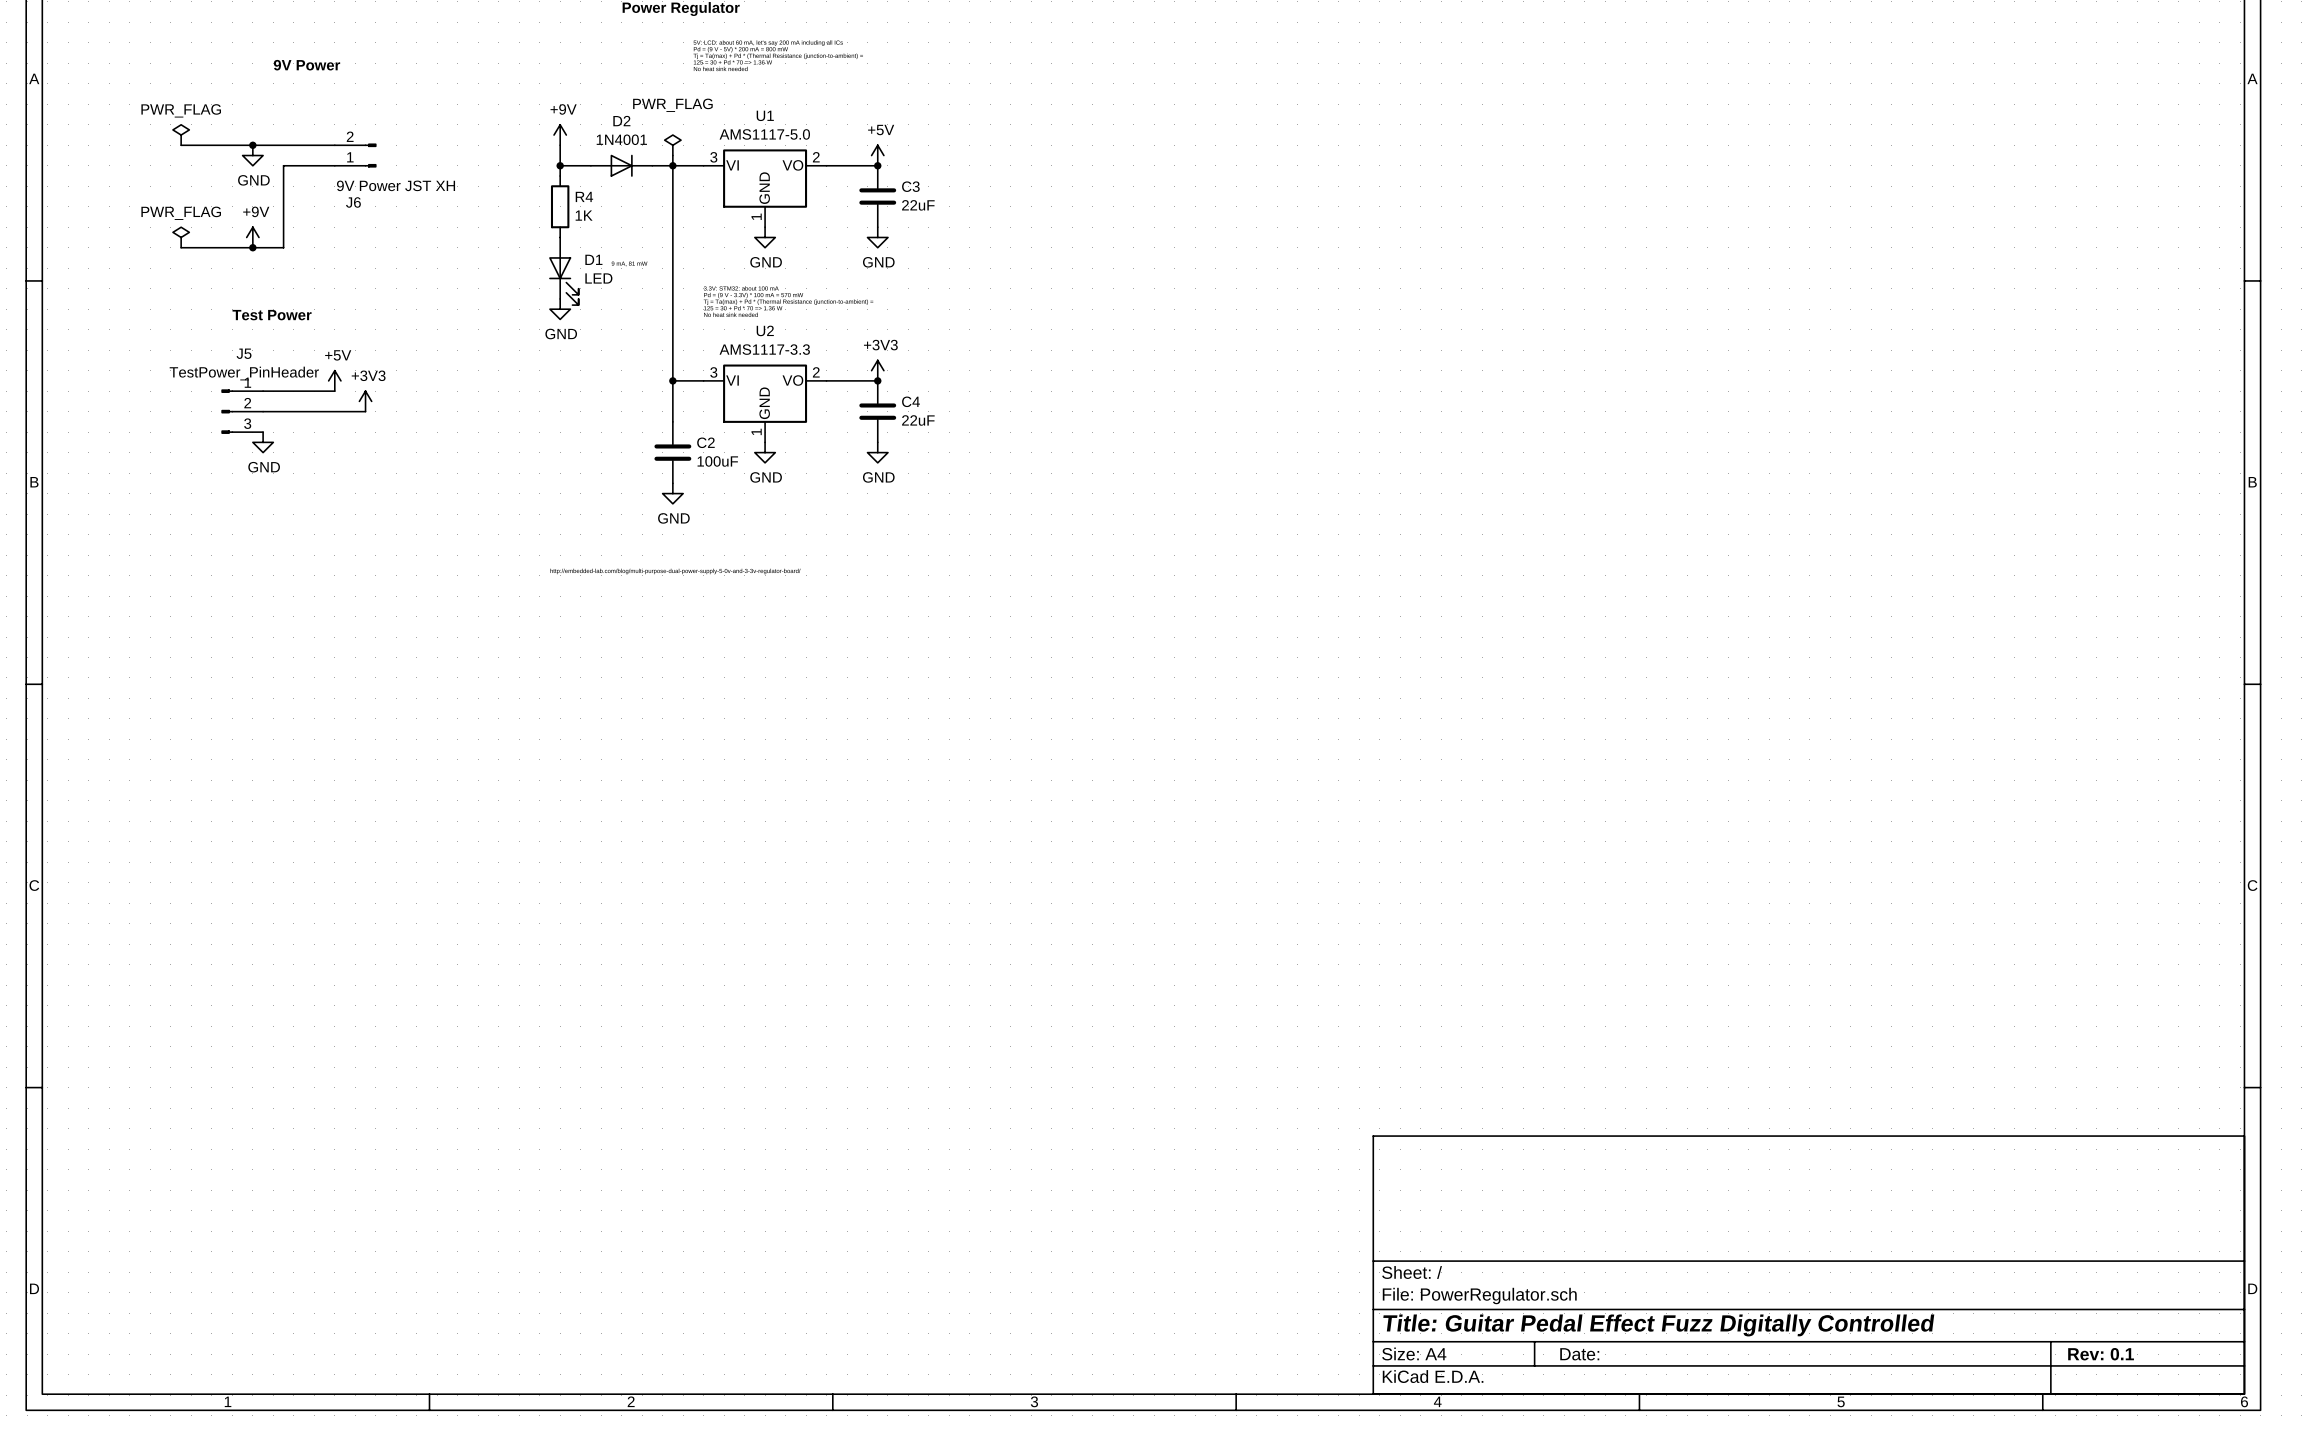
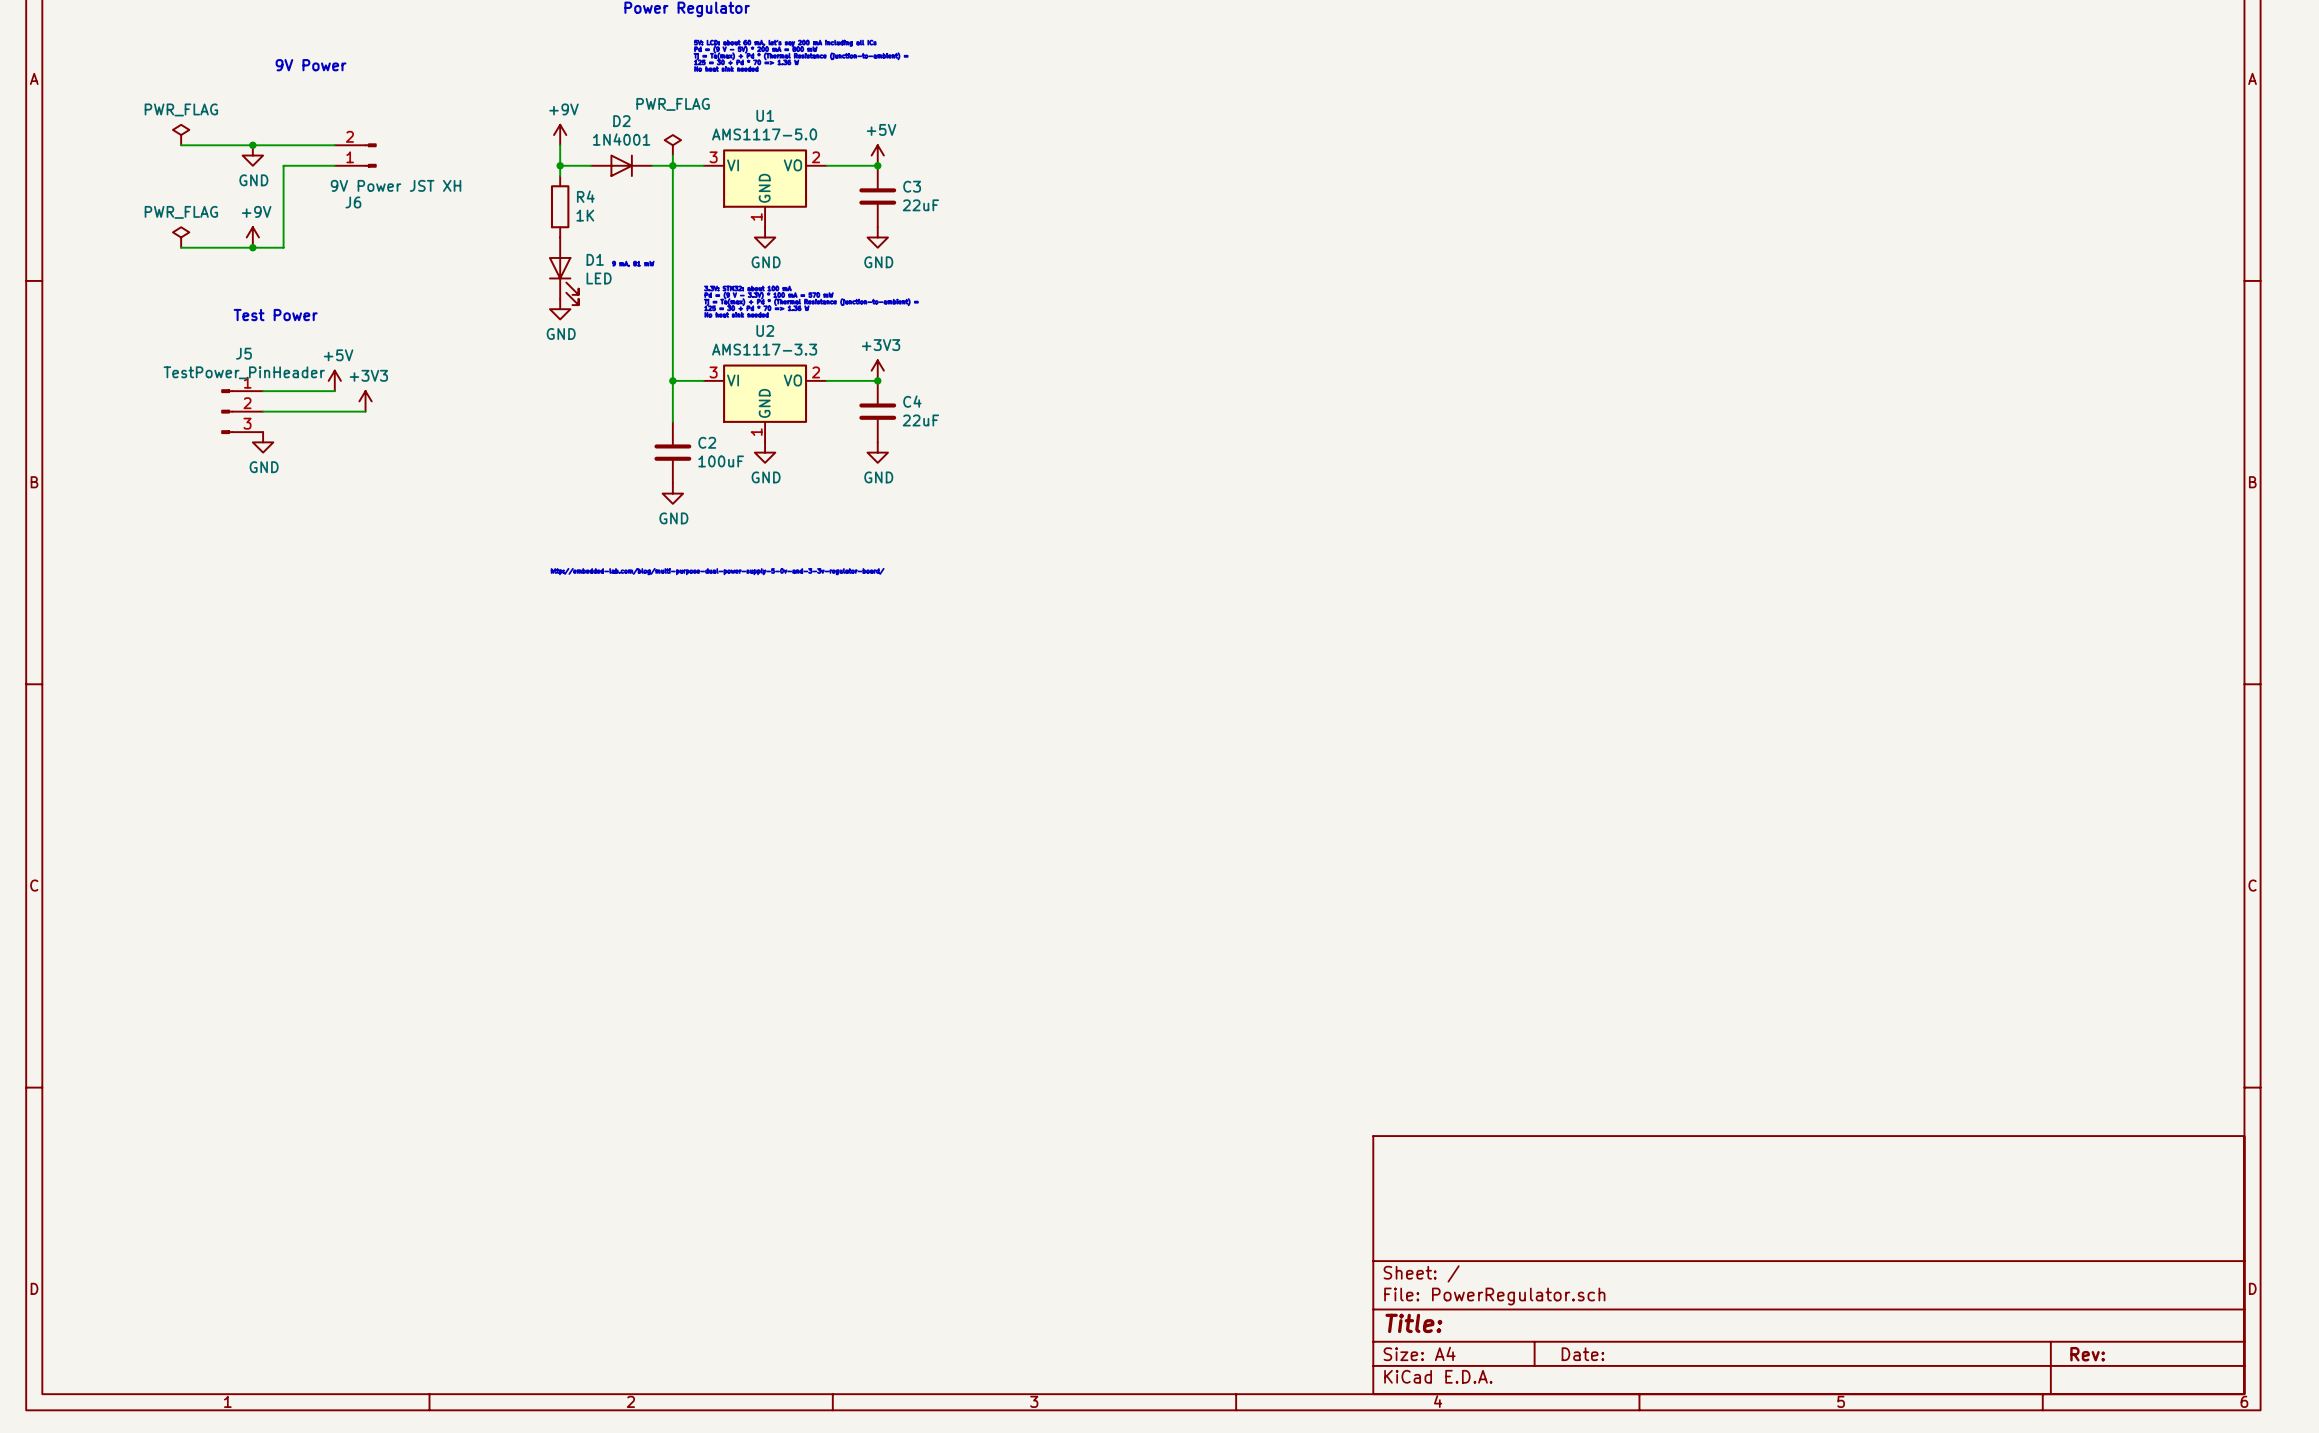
title block: Title: Guitar Pedal Effect Fuzz Digitally Controlled (1658, 1325) -> Title: (1413, 1323)
title block: Rev: 0.1 (2101, 1354) -> Rev: (2087, 1354)

